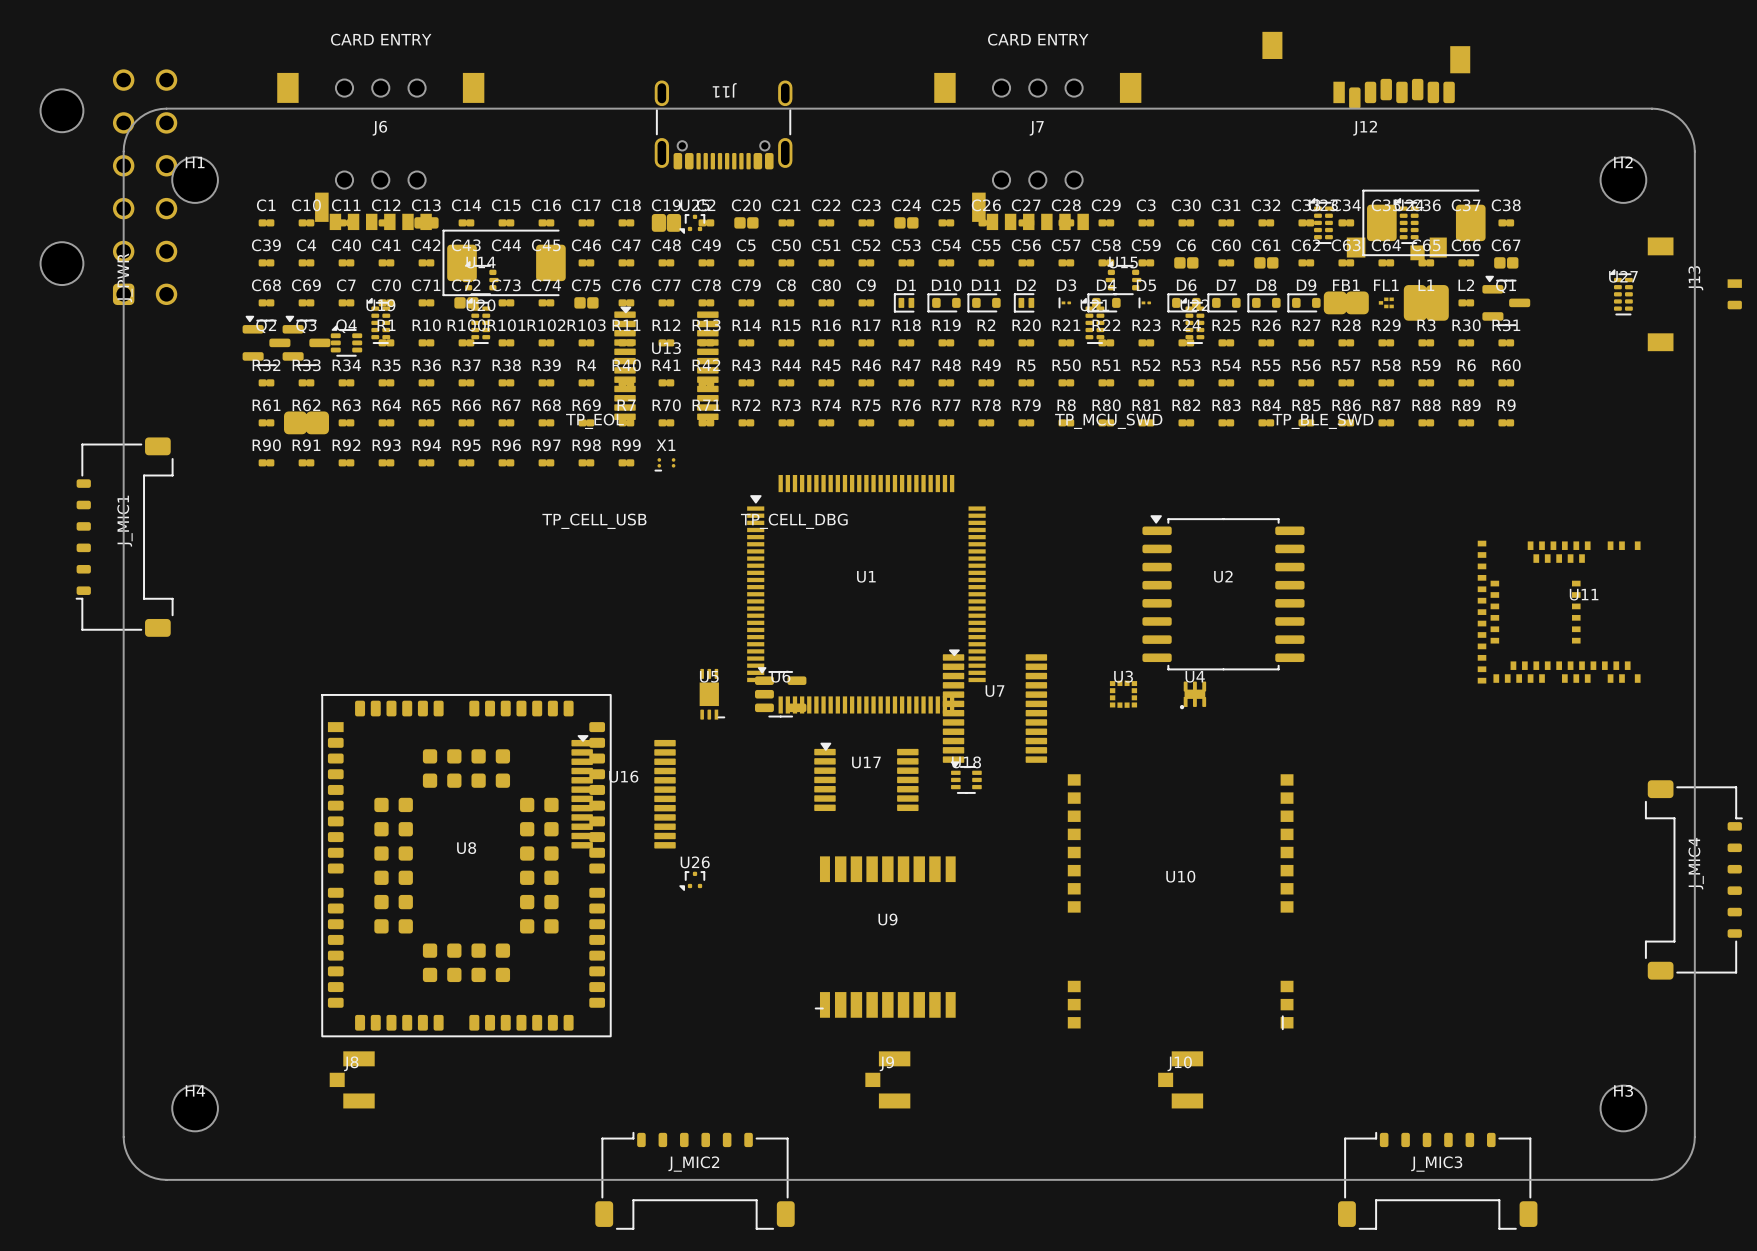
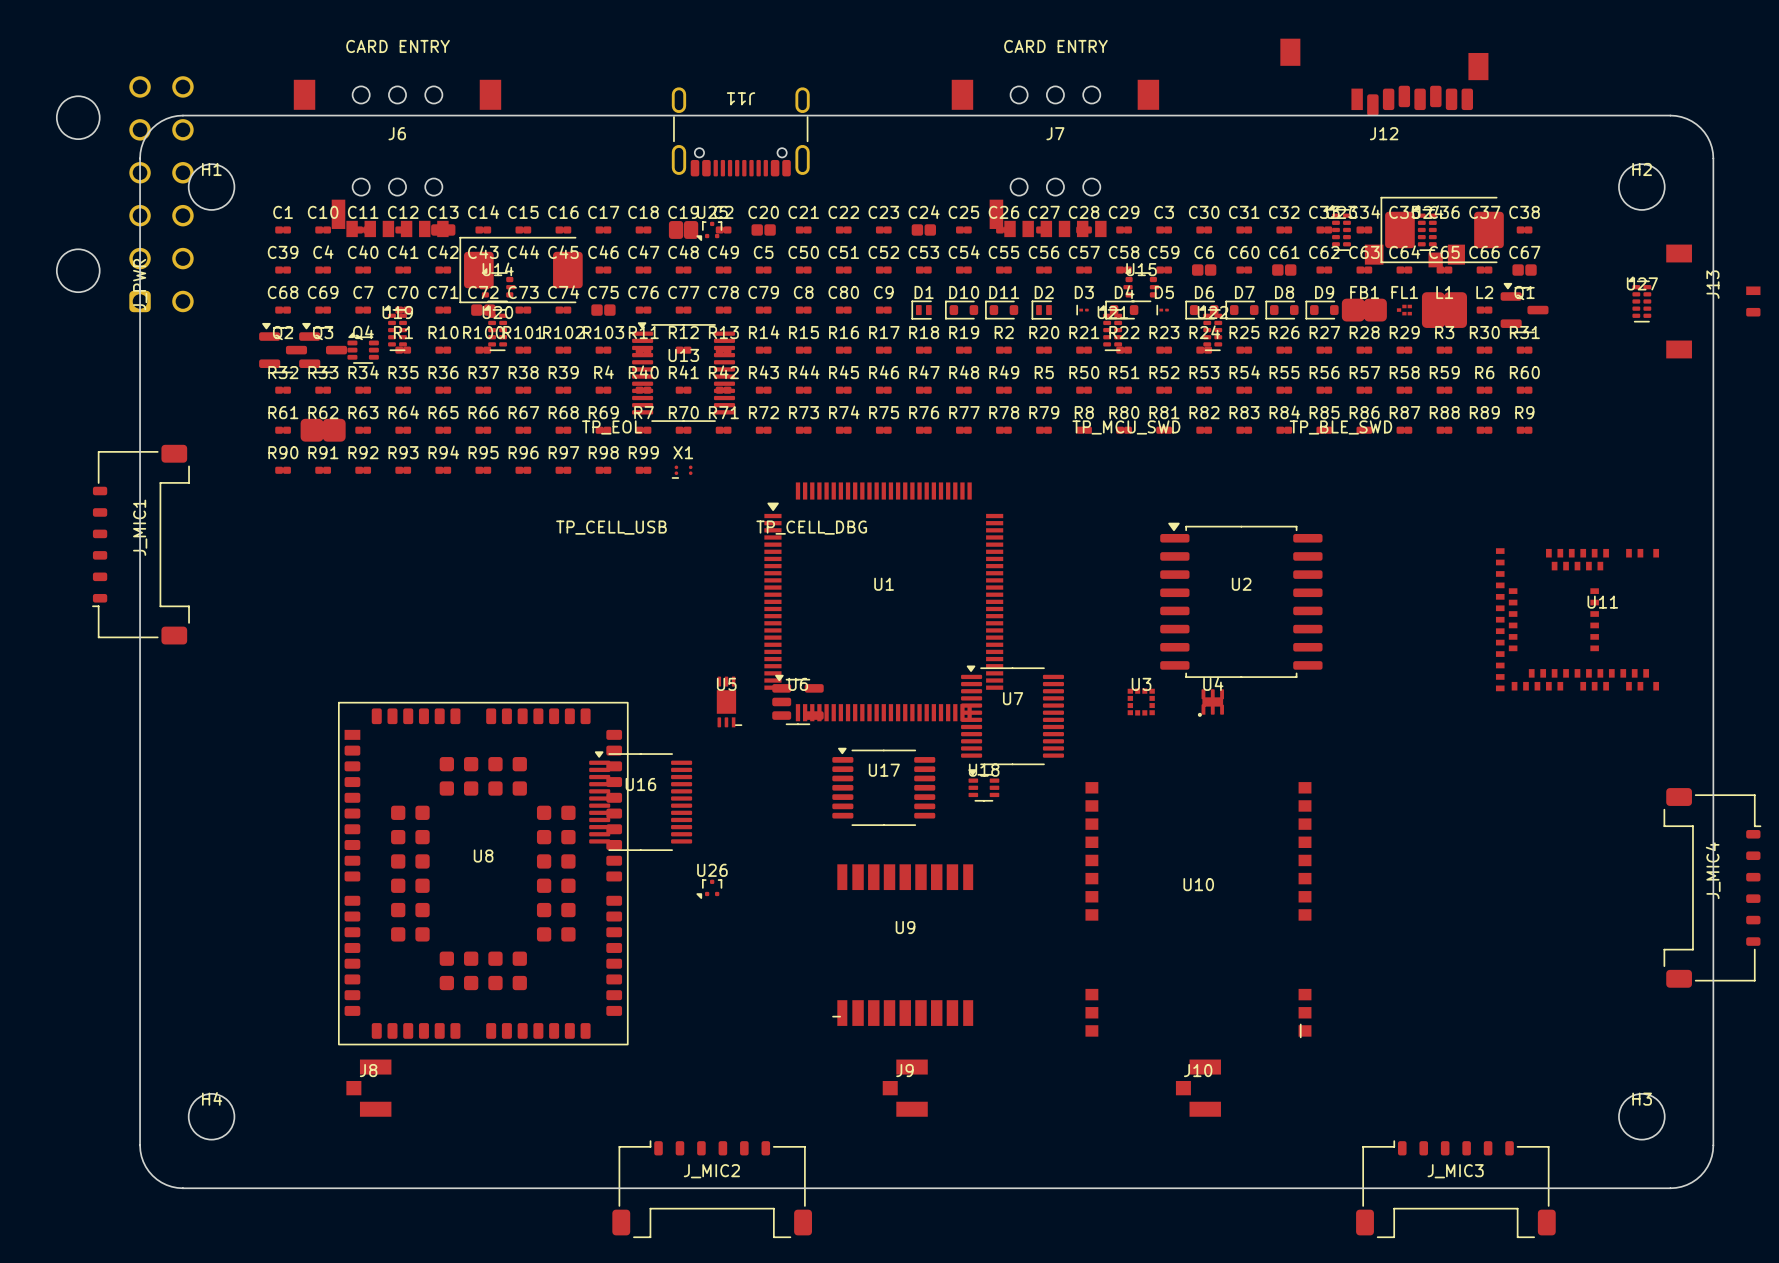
U13 footprint: [614, 306, 719, 421] -> [632, 322, 736, 422]
U7 footprint: [942, 649, 1048, 763] -> [961, 665, 1065, 766]
U16 footprint: [571, 735, 676, 849] -> [589, 751, 693, 852]
U17 footprint: [814, 742, 919, 812] -> [832, 747, 936, 826]

